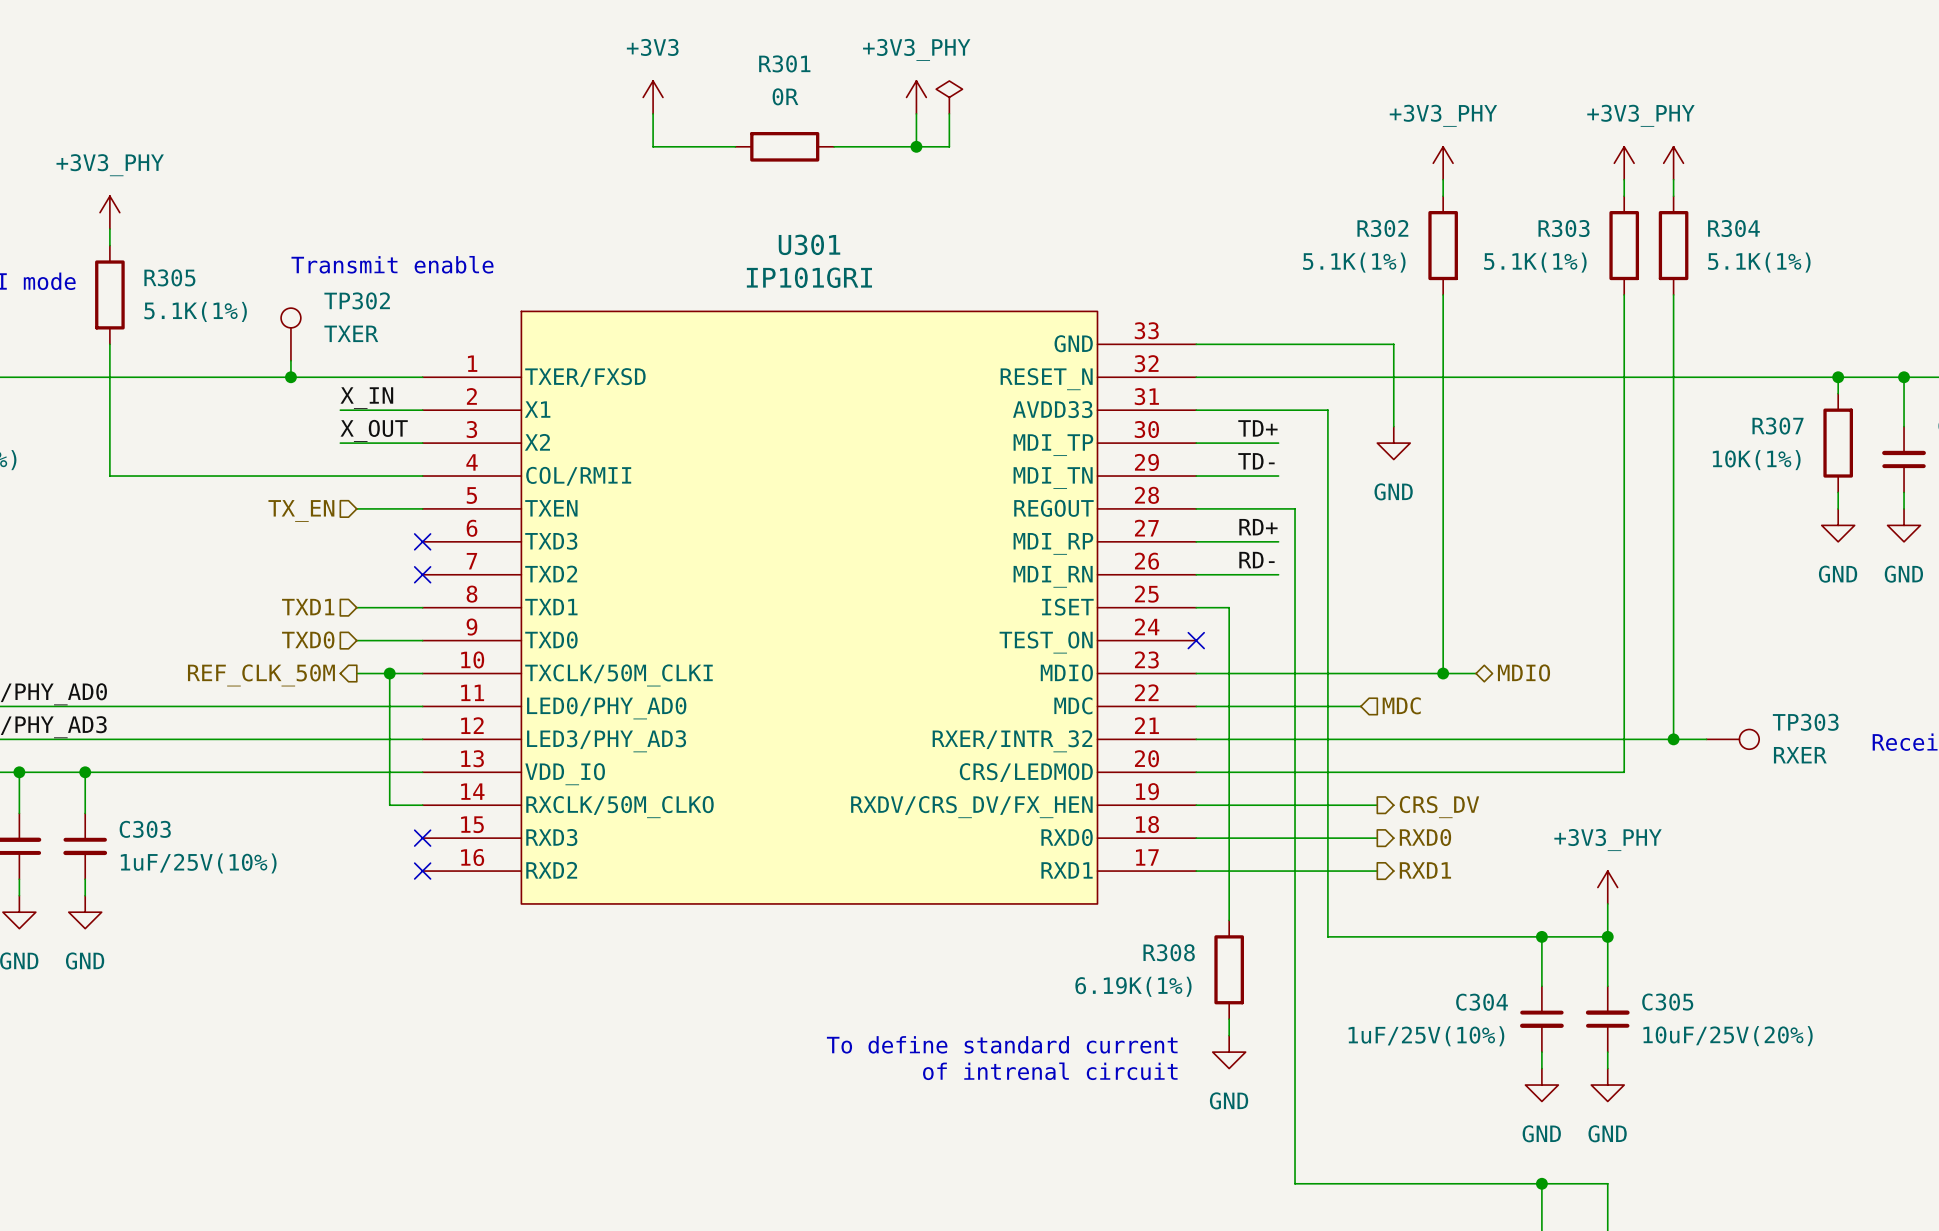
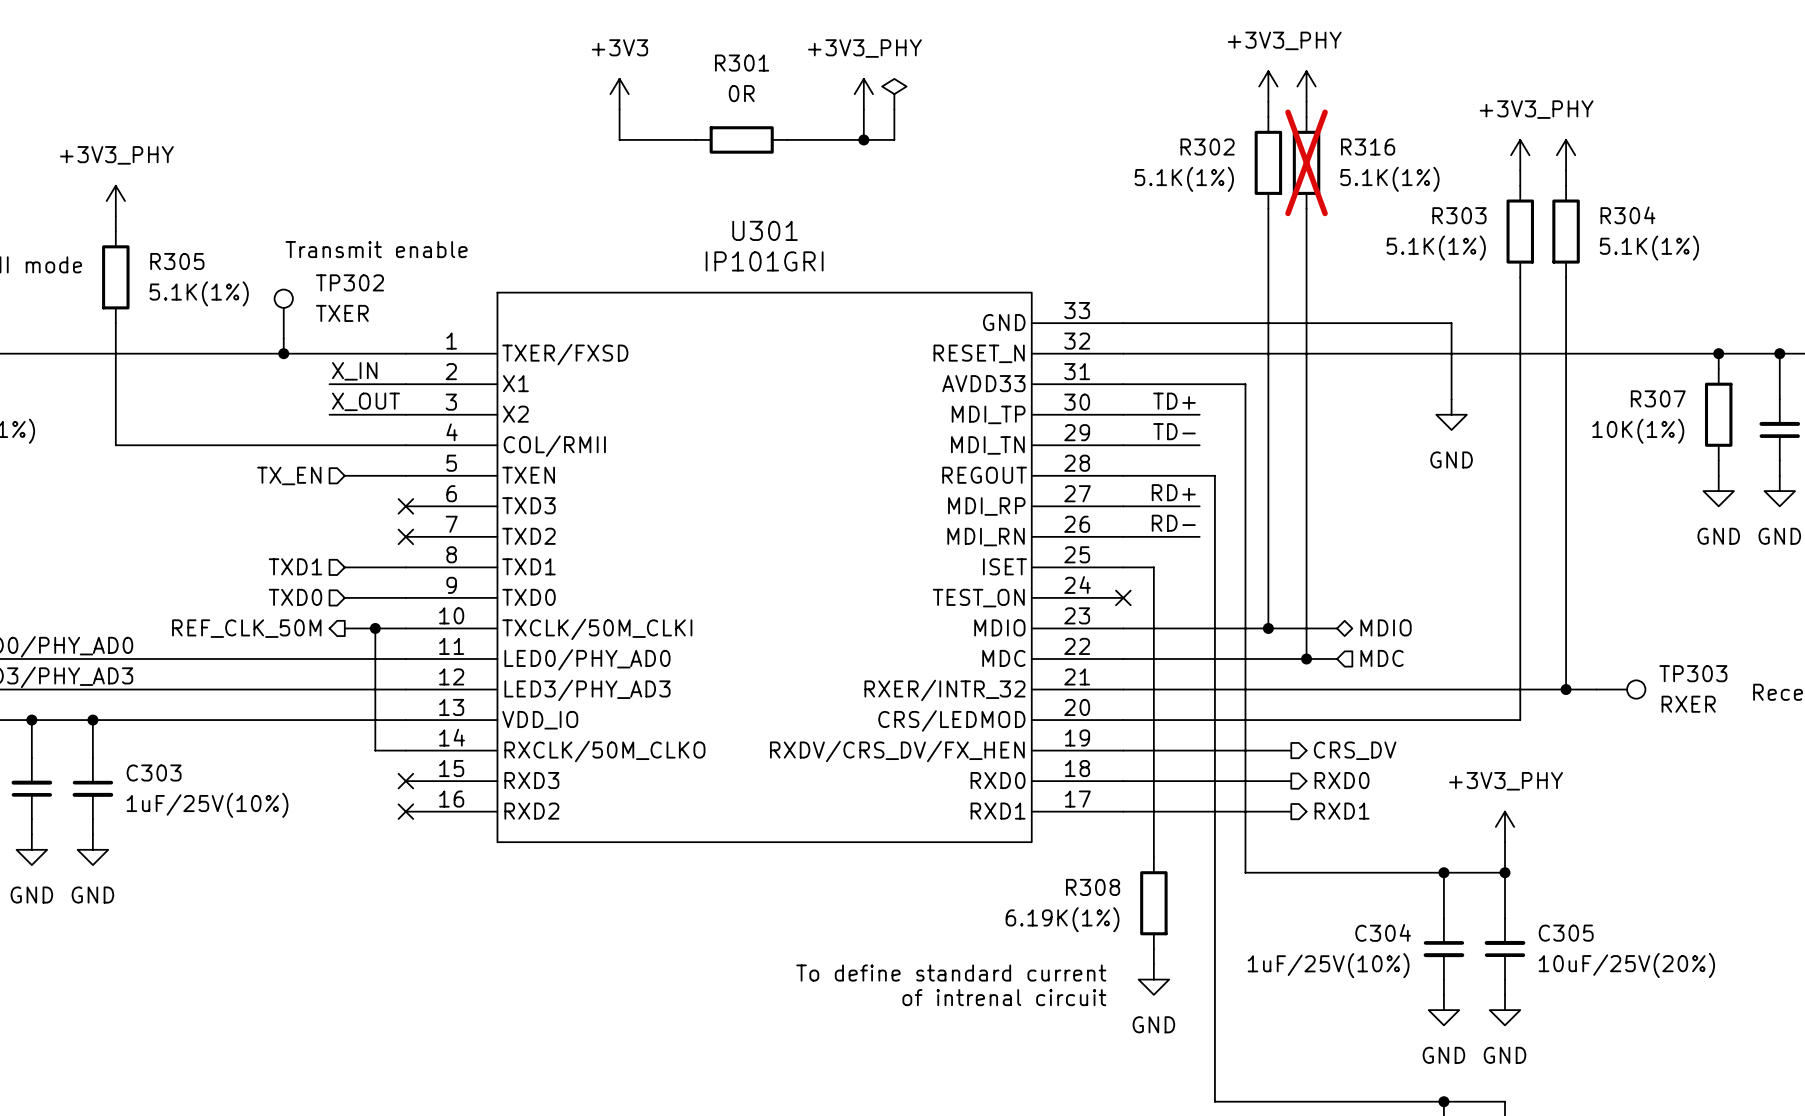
power symbol: none -> (1306, 86)
wire: none -> (1268, 101) (1268, 117)
power symbol text position: +3V3_PHY (1443, 115) -> +3V3_PHY (1284, 40)
power symbol position: +3V3_PHY (1443, 163) -> +3V3_PHY (1268, 86)
R316: none -> 5.1K(1%) (1306, 162)
wire: (1443, 179) (1443, 196) -> (1306, 101) (1306, 117)
wire: none -> (1268, 208) (1268, 628)
wire: none -> (1306, 208) (1306, 323) (1451, 323) (1451, 399)
R302 position: (1443, 245) -> (1268, 162)
wire: (1443, 294) (1443, 673) -> none
wire: none -> (1306, 399) (1306, 658)
power symbol position: GND (1393, 443) -> GND (1451, 414)
hierarchical label position: MDIO (1523, 672) -> MDIO (1386, 627)
junction: none -> (1268, 628)
wire: (1426, 673) (1476, 673) -> none
junction: (1443, 673) -> none
hierarchical label position: MDC (1401, 705) -> MDC (1382, 658)
wire: none -> (1276, 658) (1337, 658)
junction: none -> (1306, 658)

